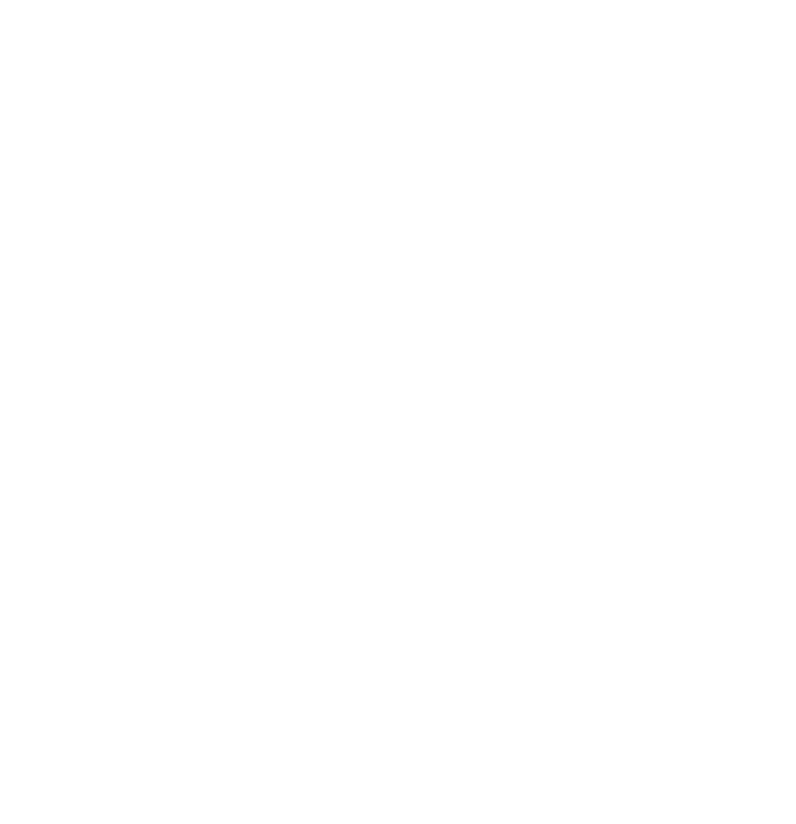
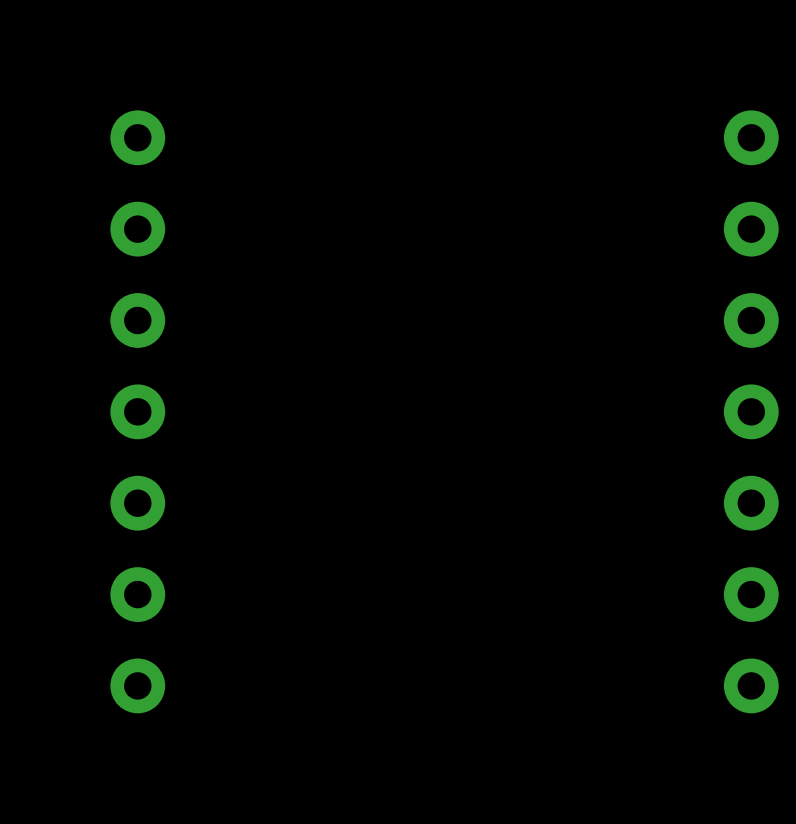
part: none -> (137, 411)
part: none -> (751, 411)

